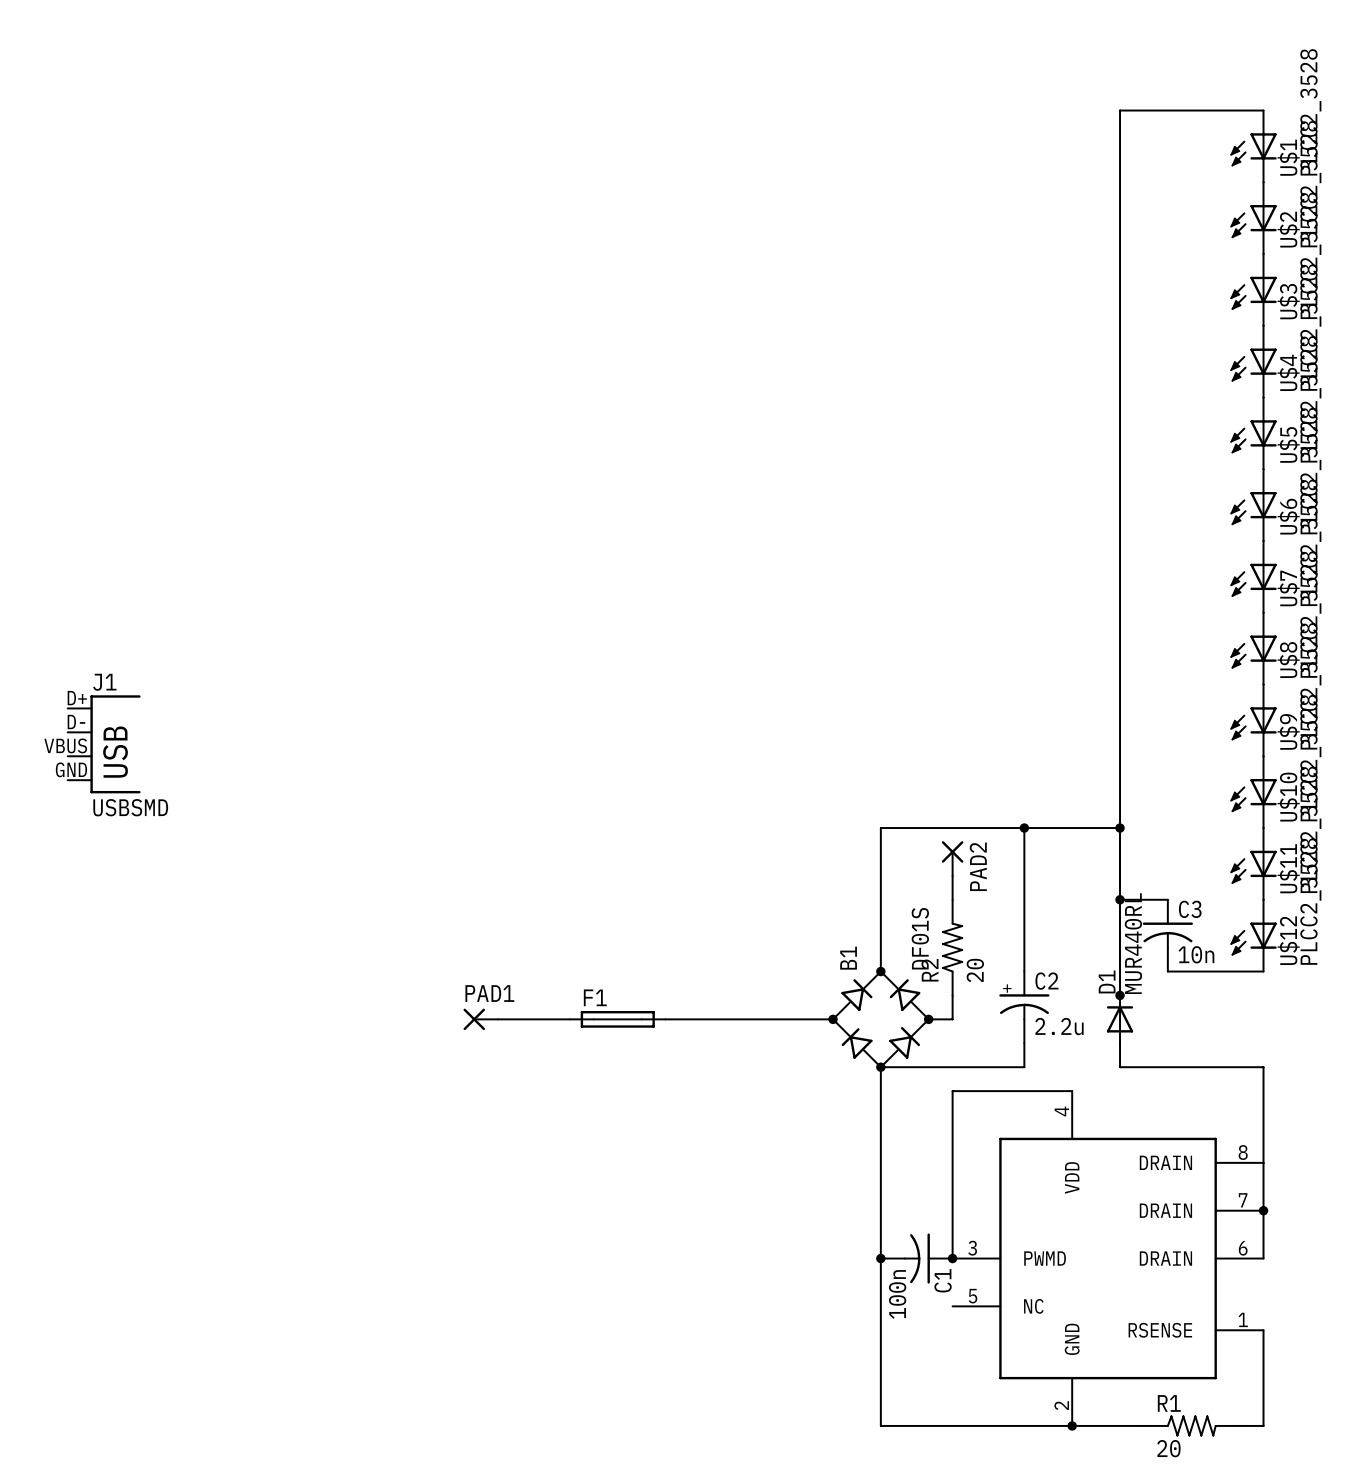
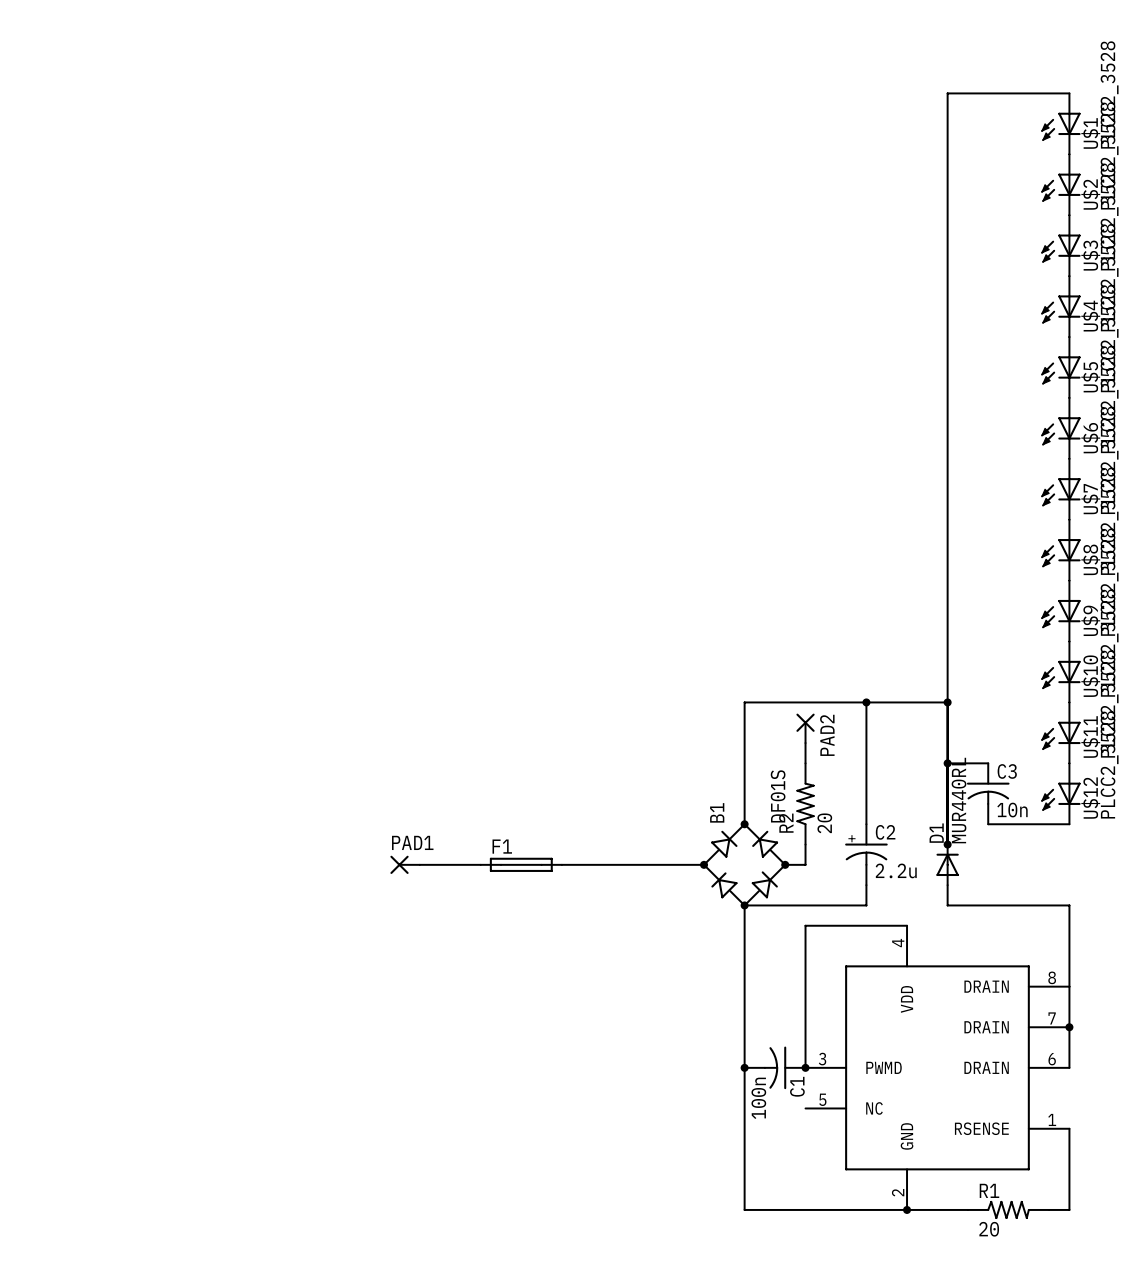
J1: USBSMD (104, 744) -> none

